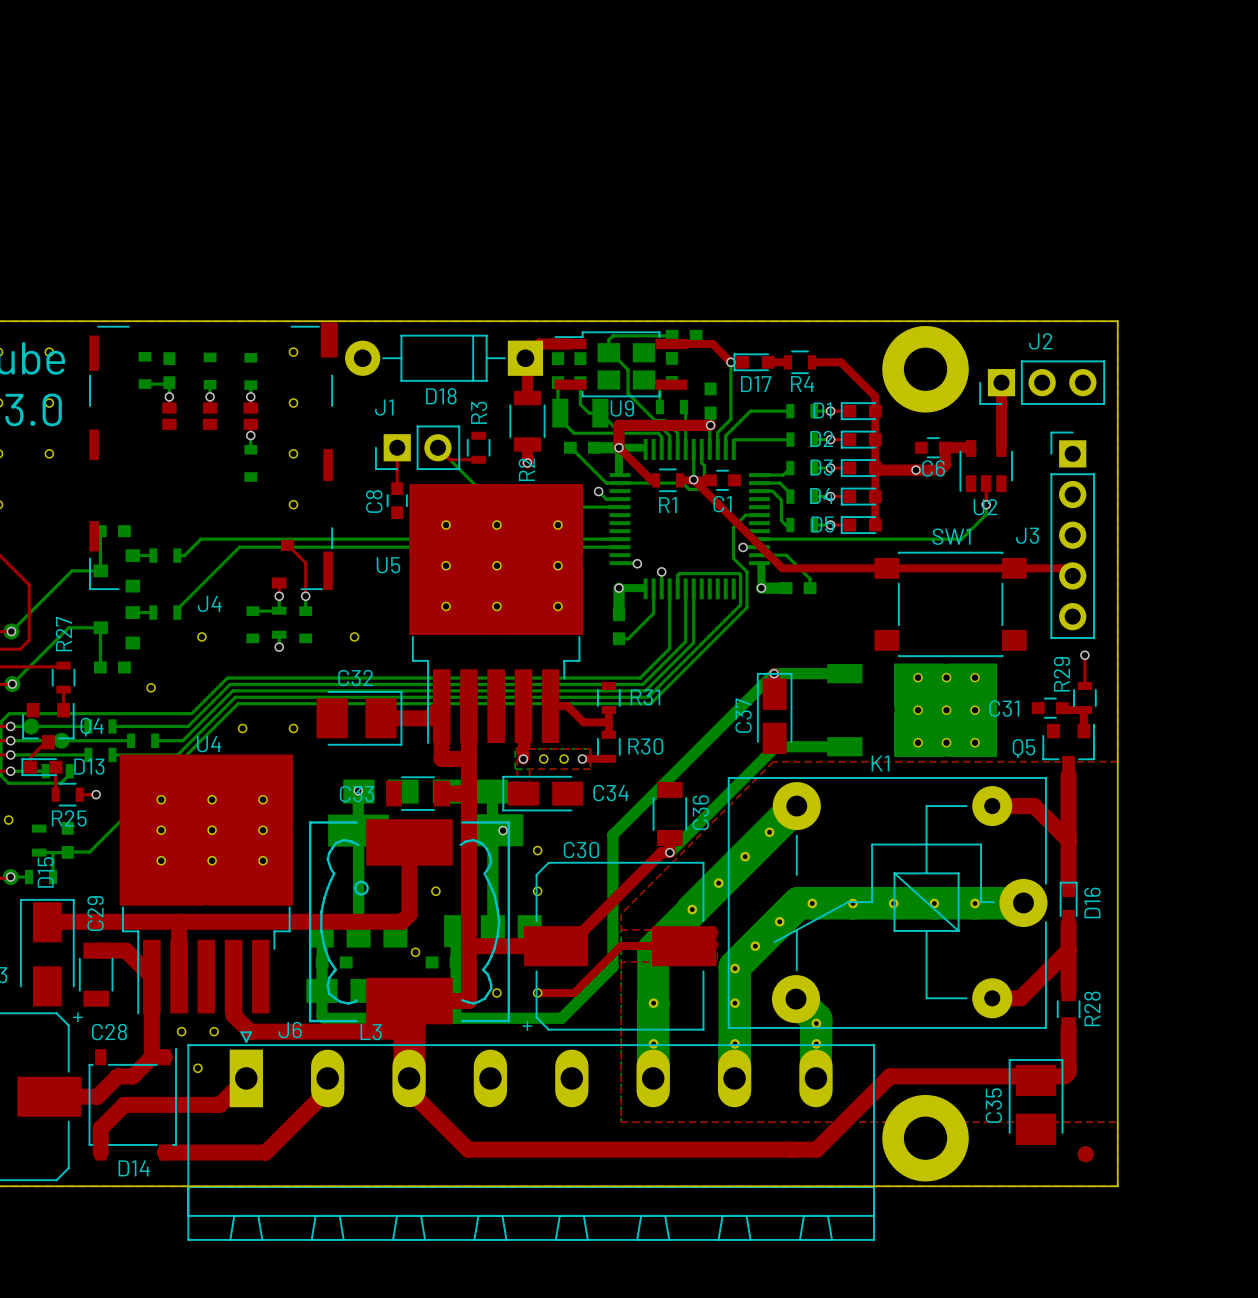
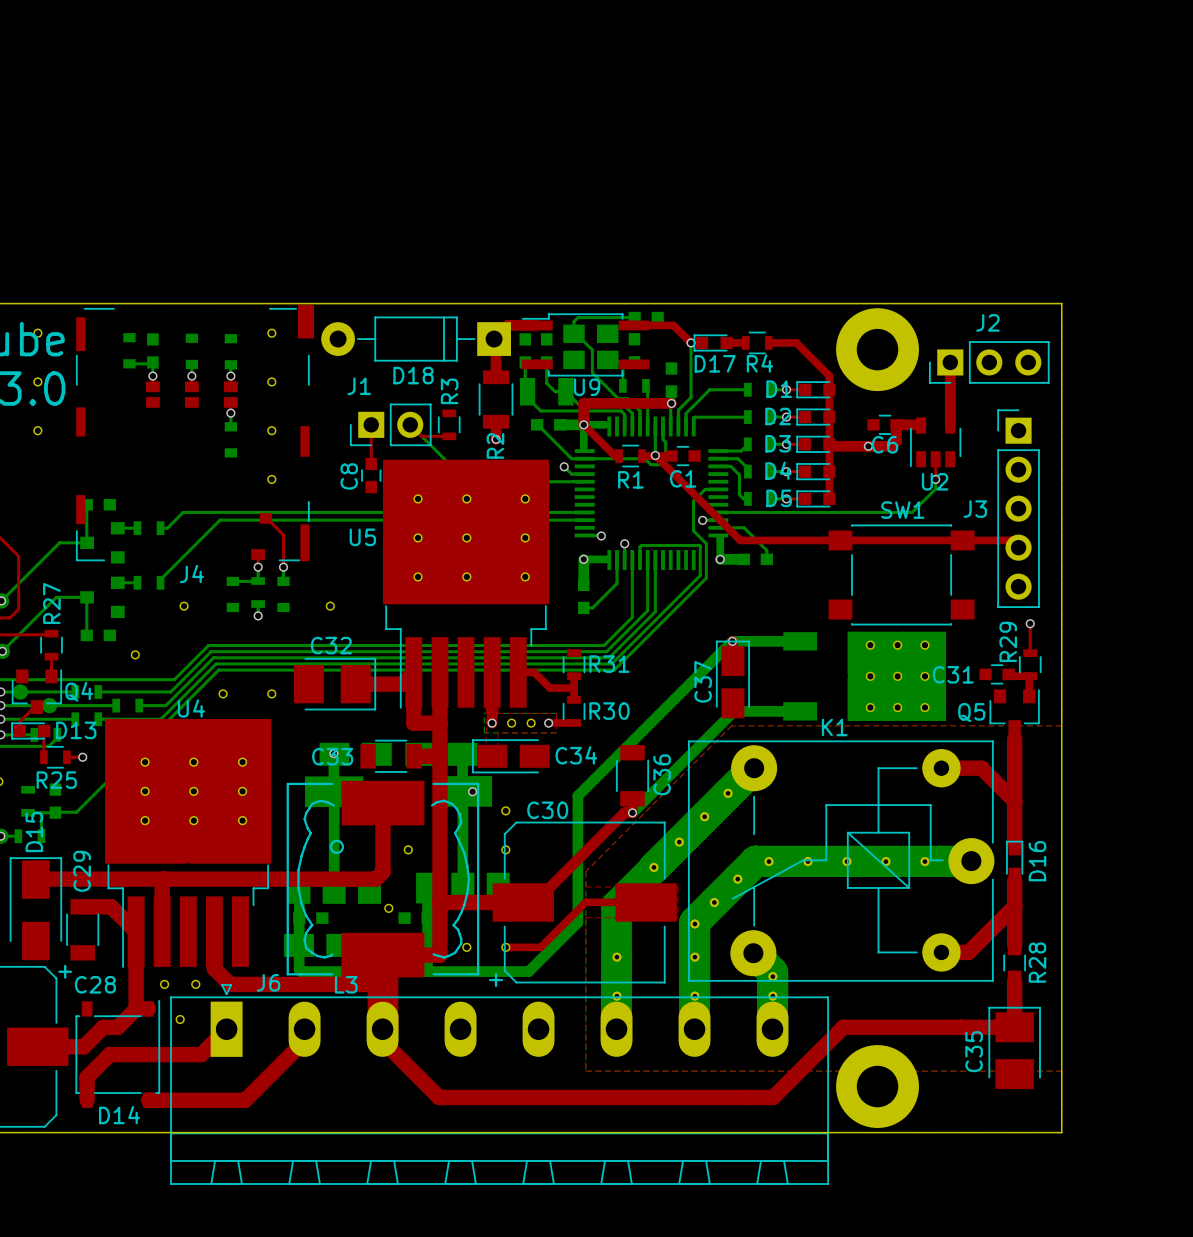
C35 position: (1036, 1102) -> (1014, 1047)
part: (1085, 1154) -> none

